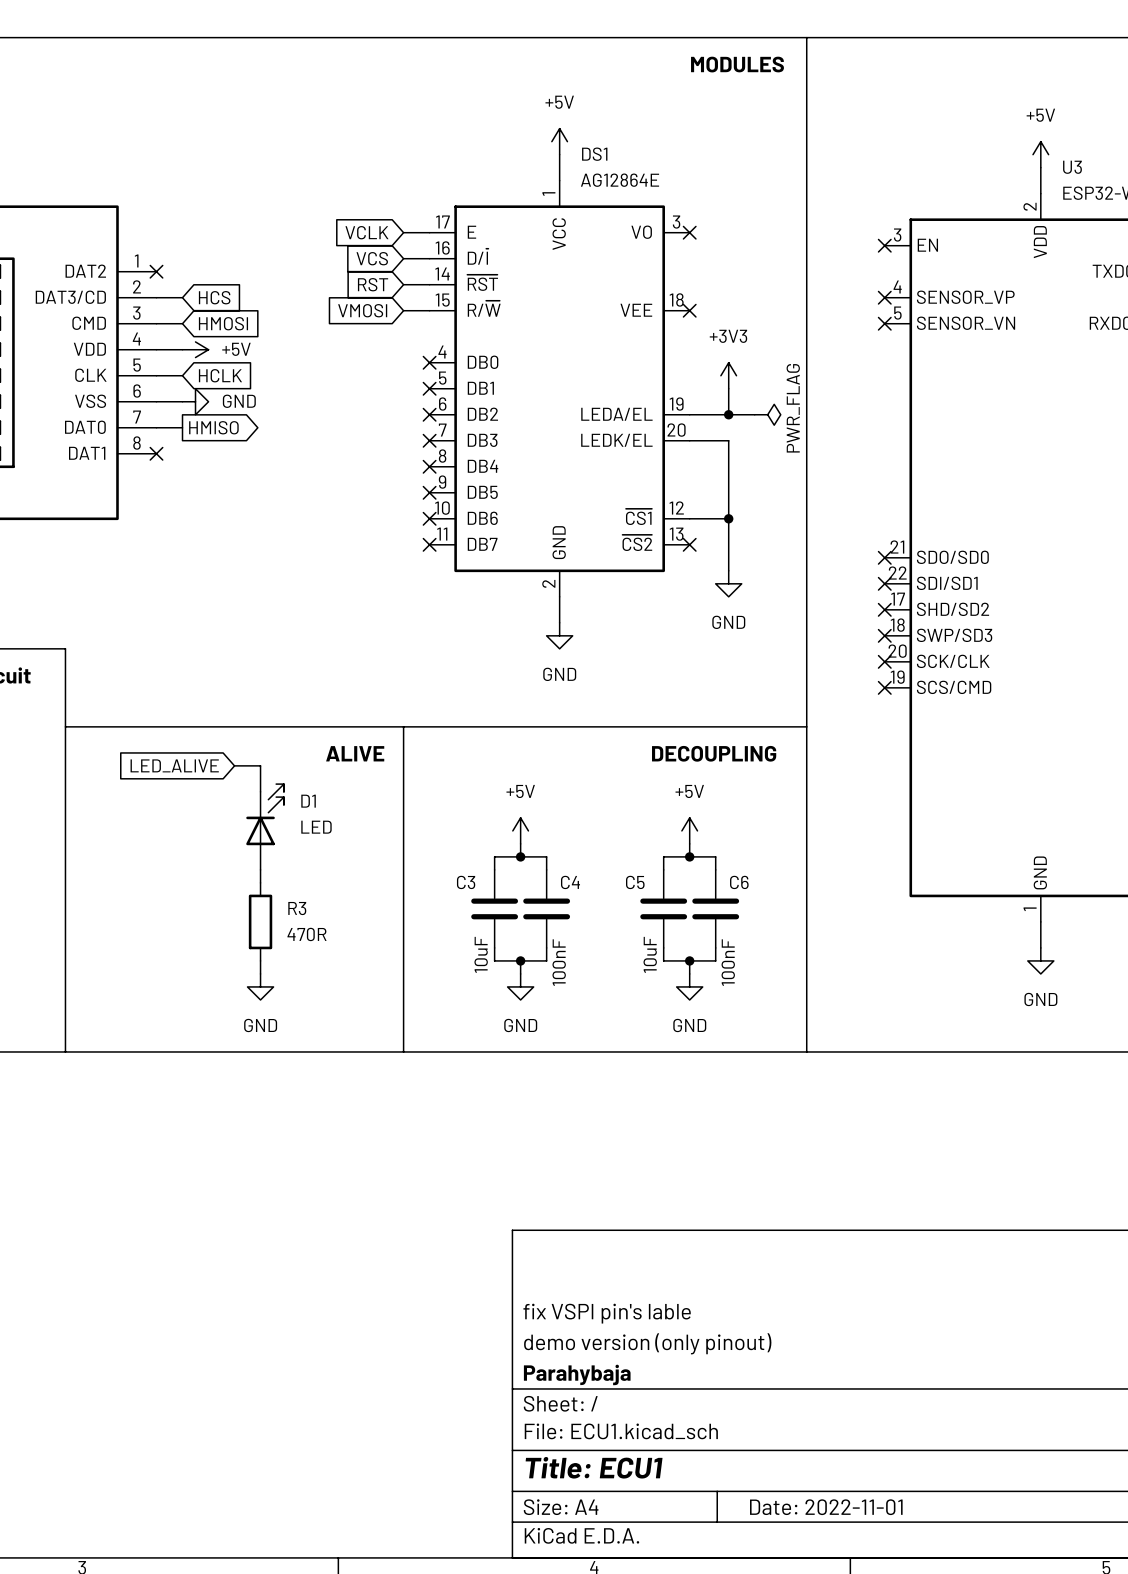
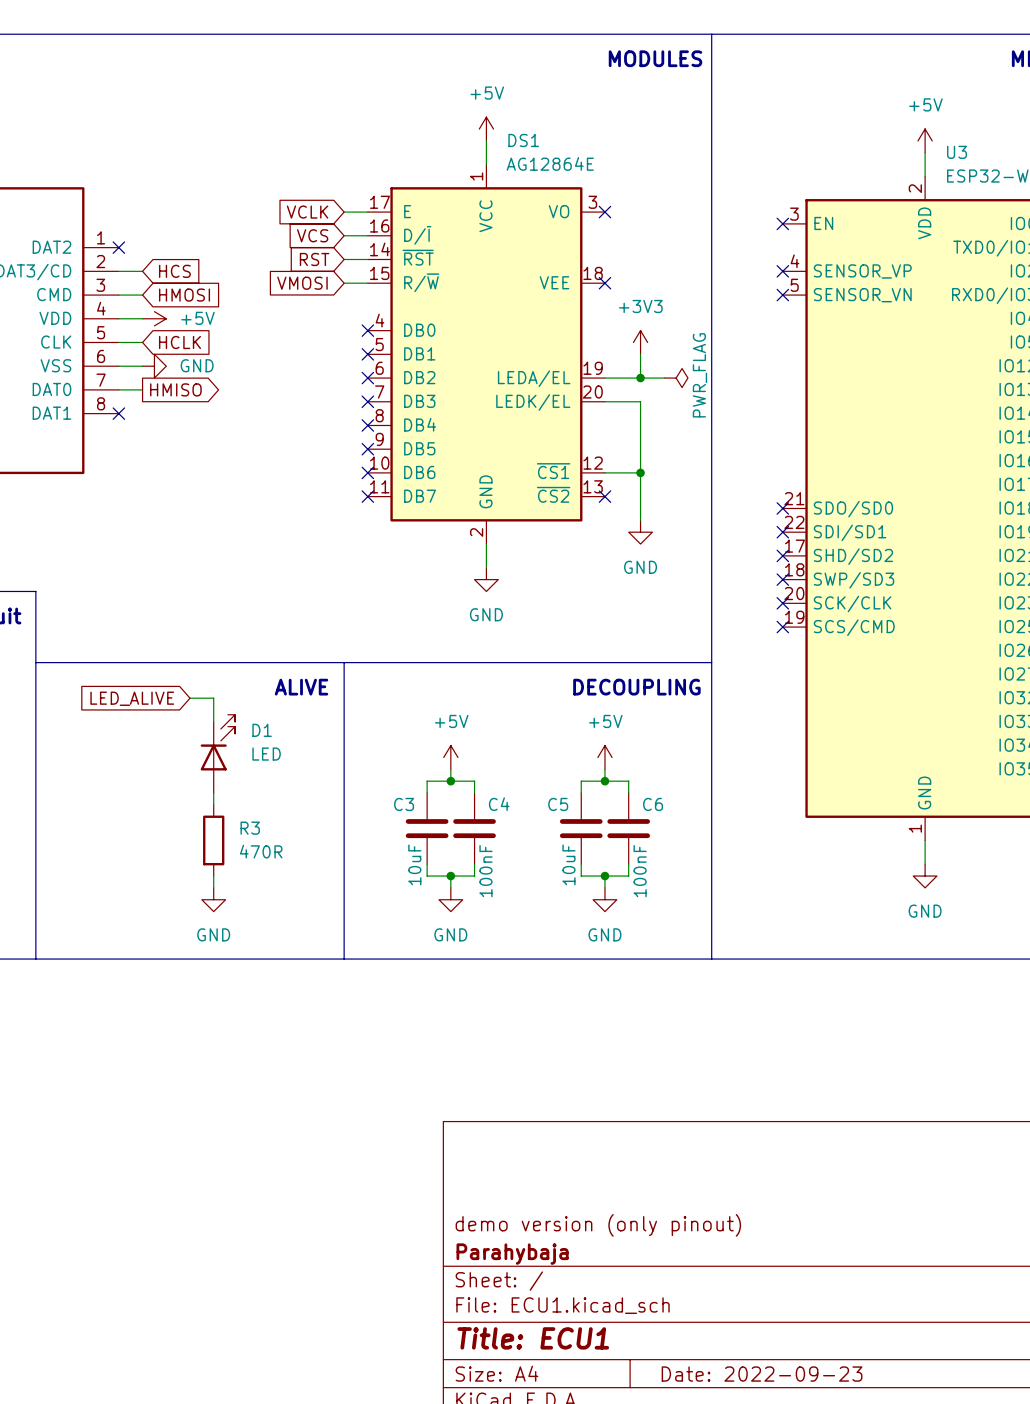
title block: fix VSPI pin's lable (607, 1313) -> none
title block: Date: 2022-11-01 (826, 1507) -> Date: 2022-09-23 (762, 1374)

